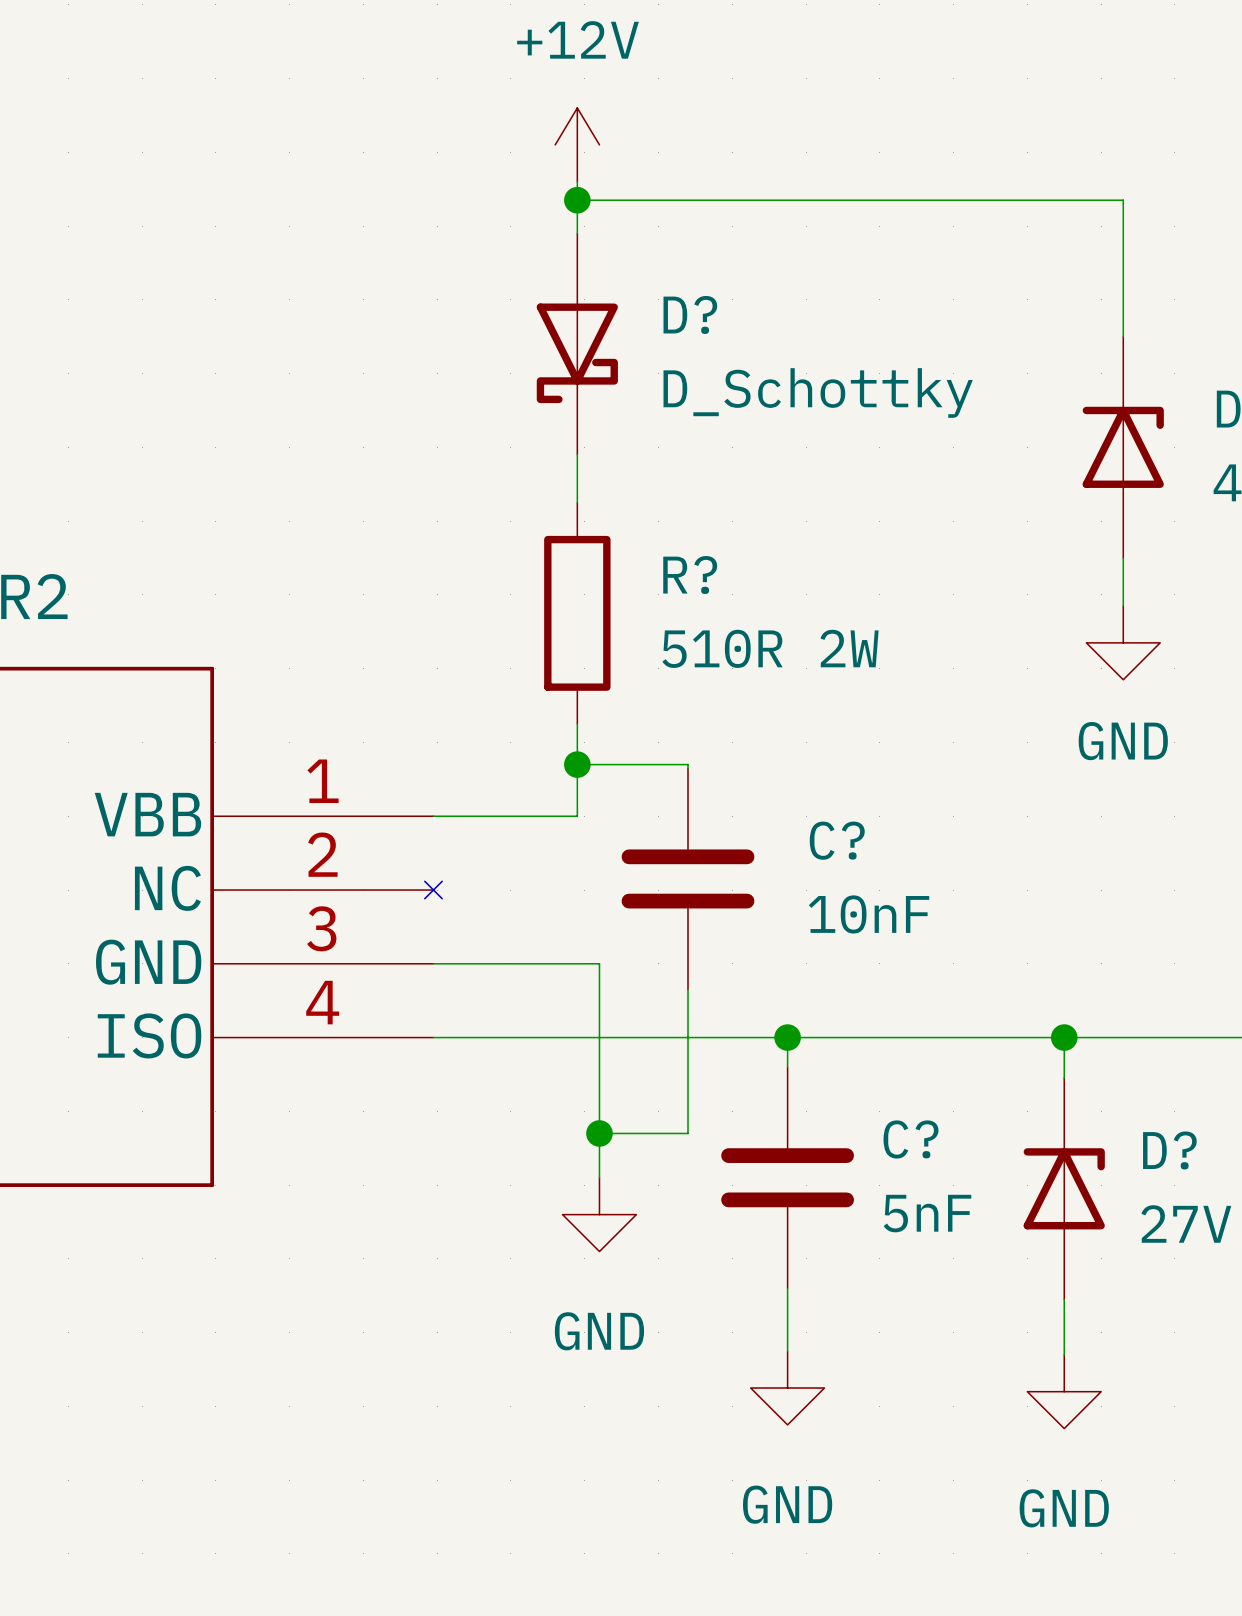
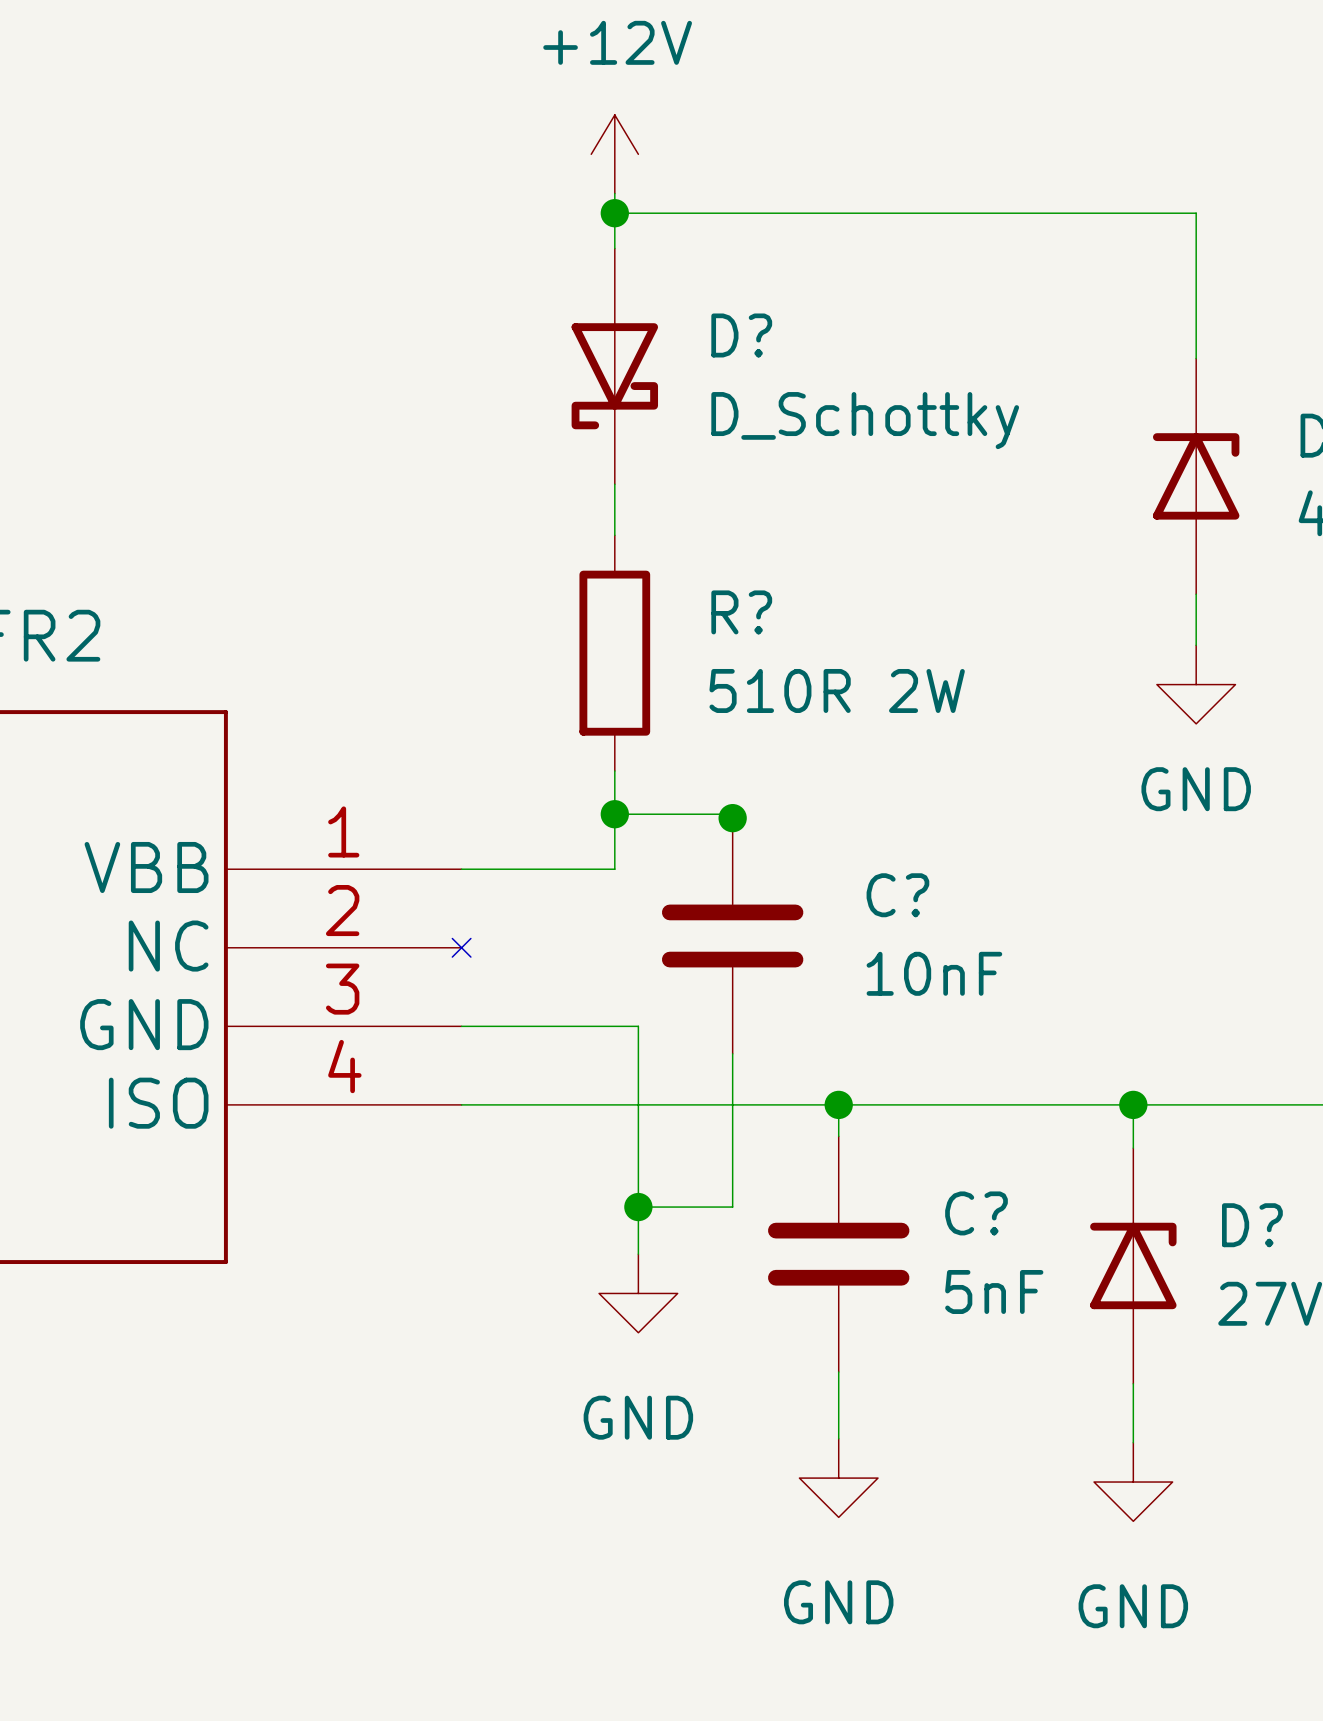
junction: none -> (732, 818)

